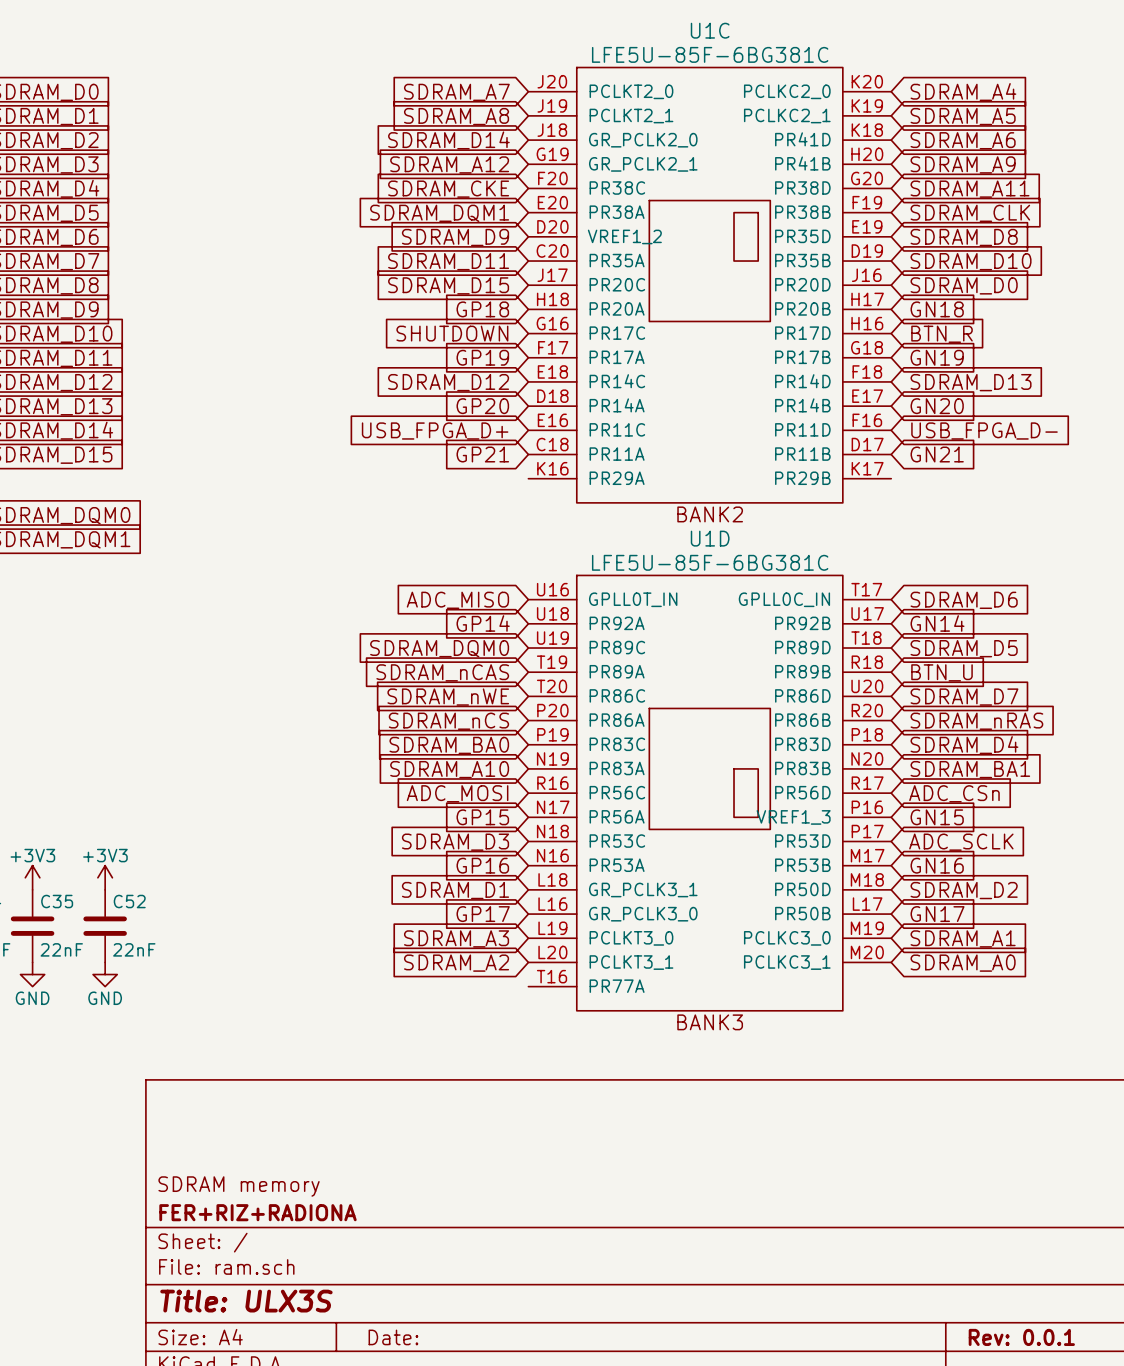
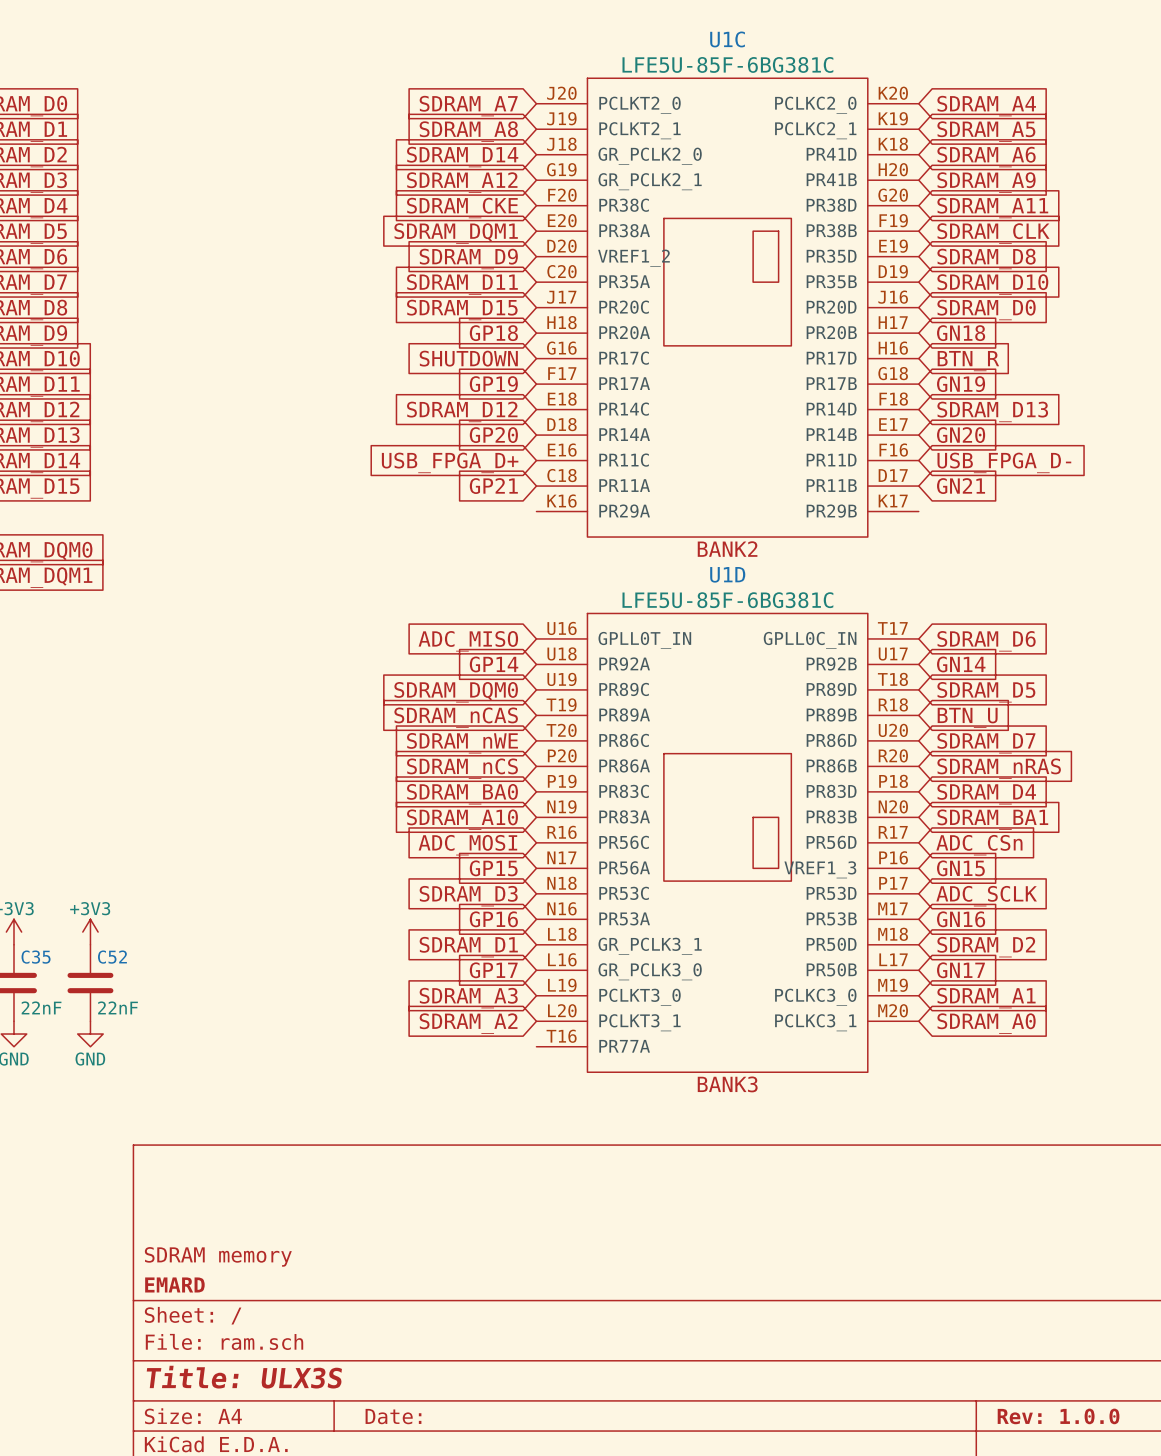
title block: FER+RIZ+RADIONA (257, 1212) -> EMARD (174, 1284)
title block: Rev: 0.0.1 (1021, 1337) -> Rev: 1.0.0 (1058, 1416)

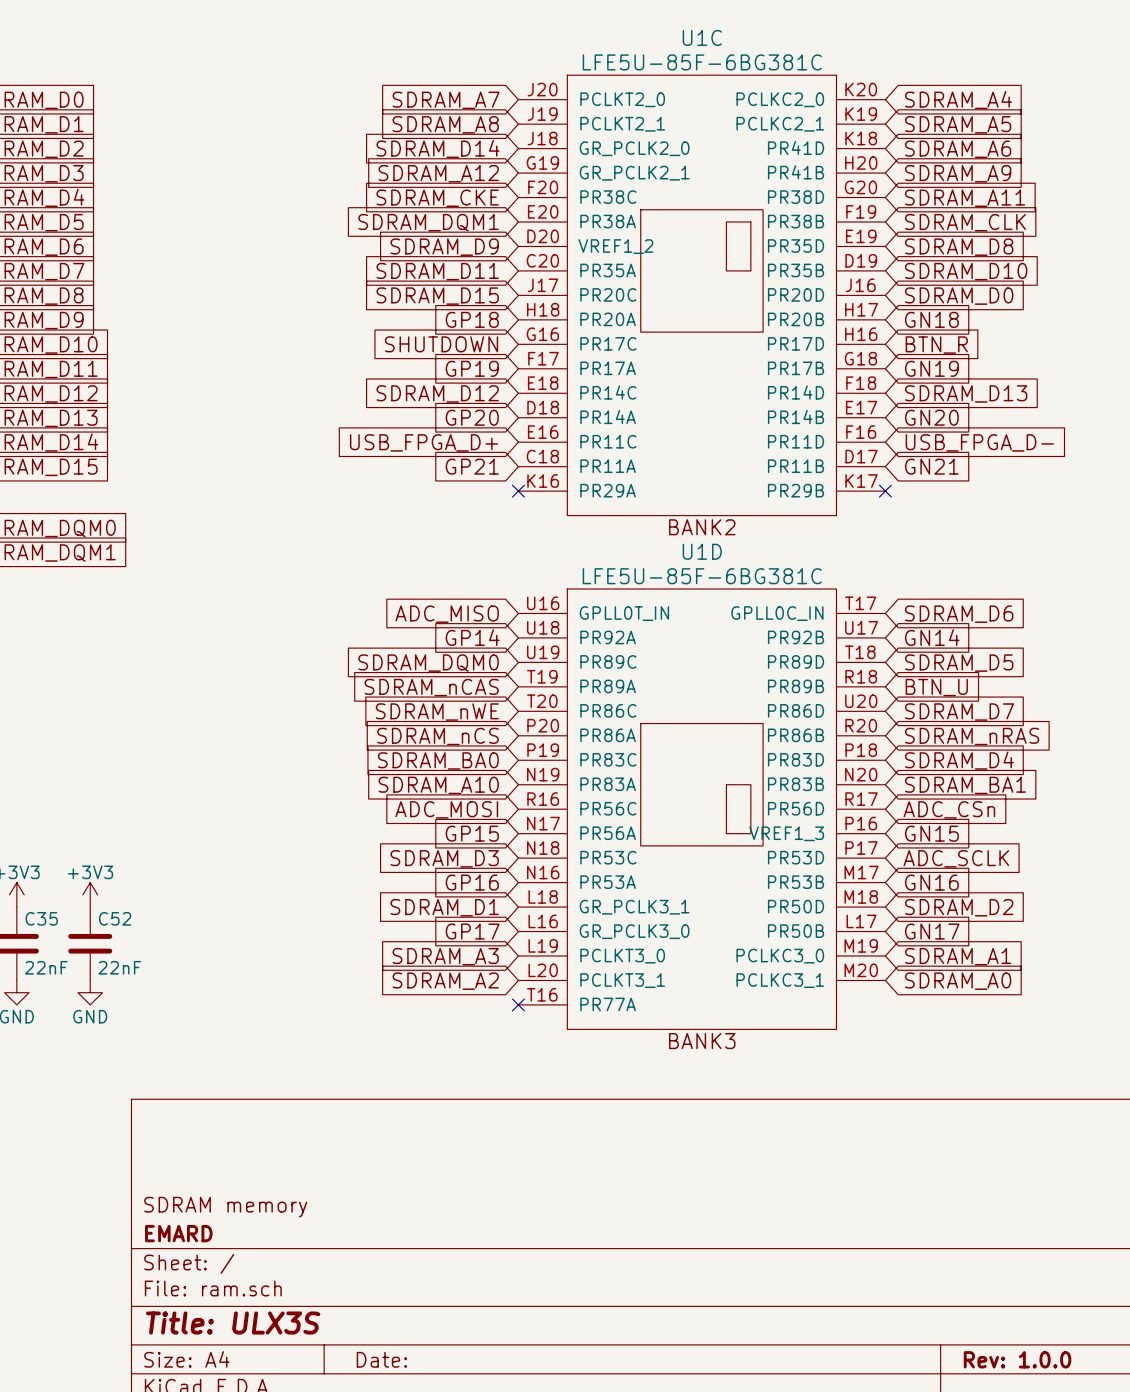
no-connect mark: none -> (518, 491)
no-connect mark: none -> (885, 491)
no-connect mark: none -> (518, 1004)

